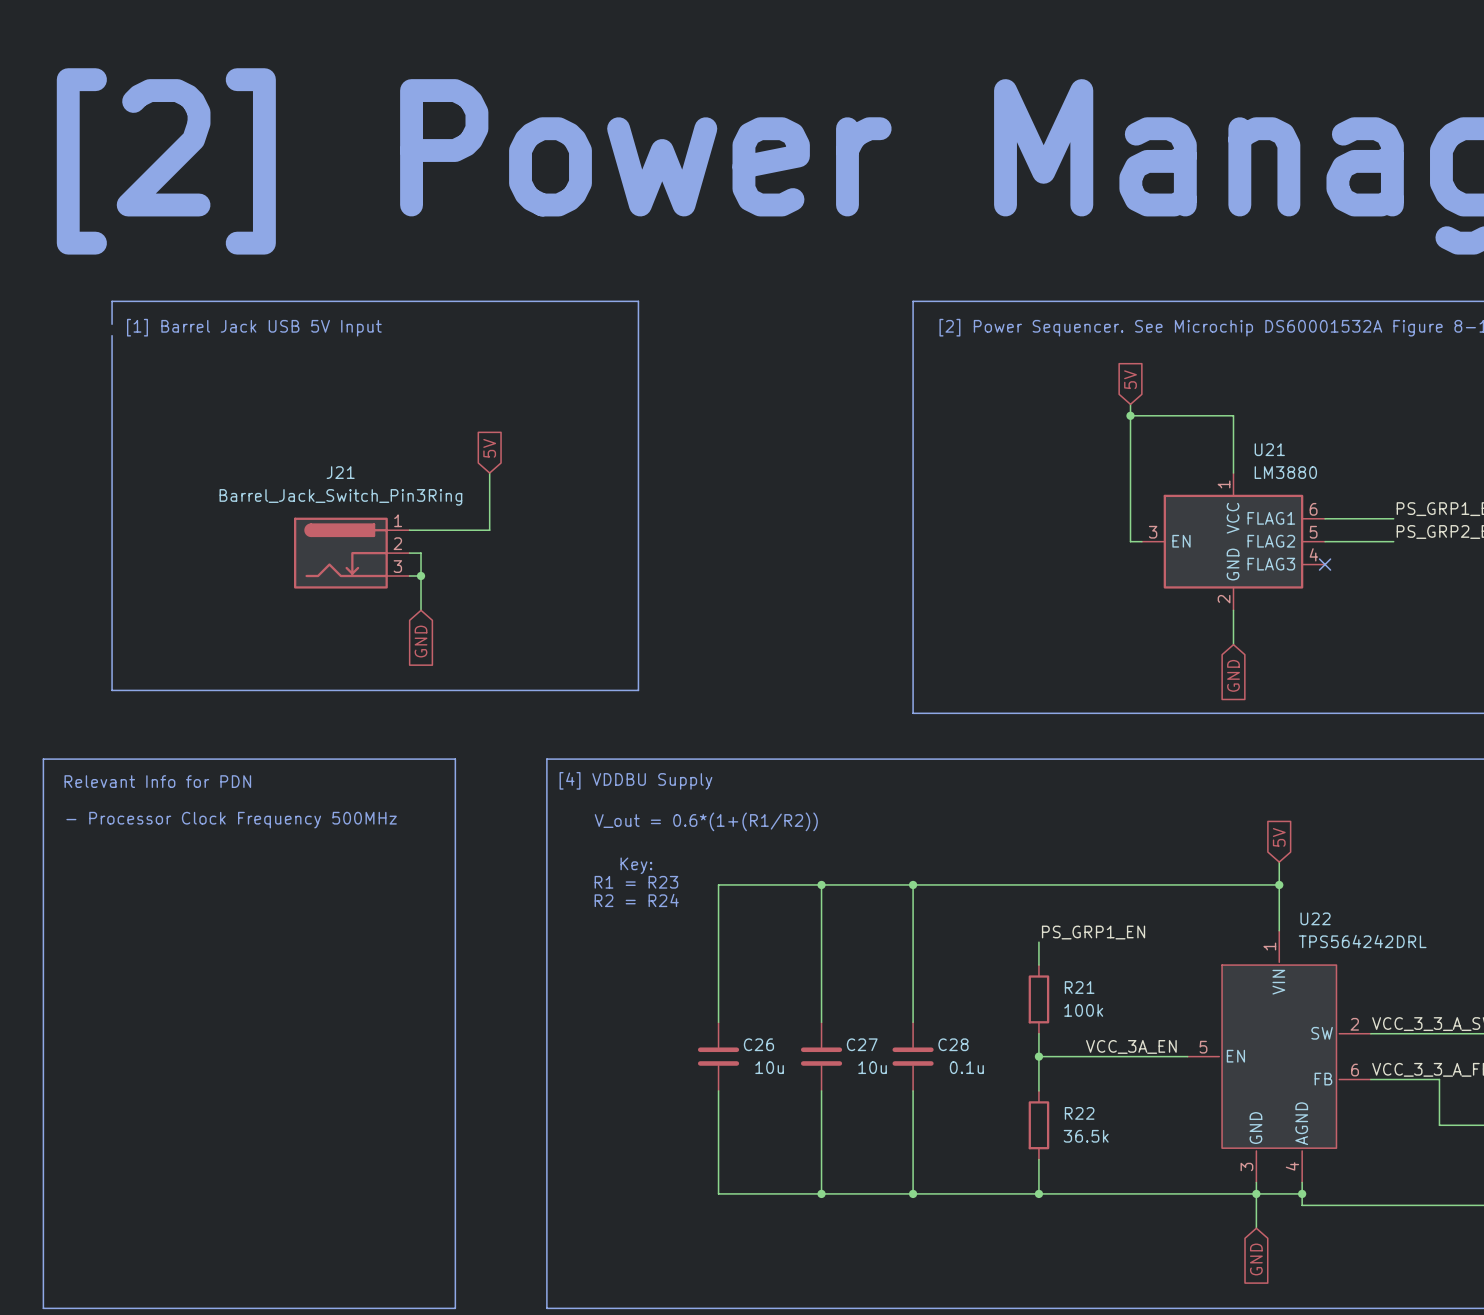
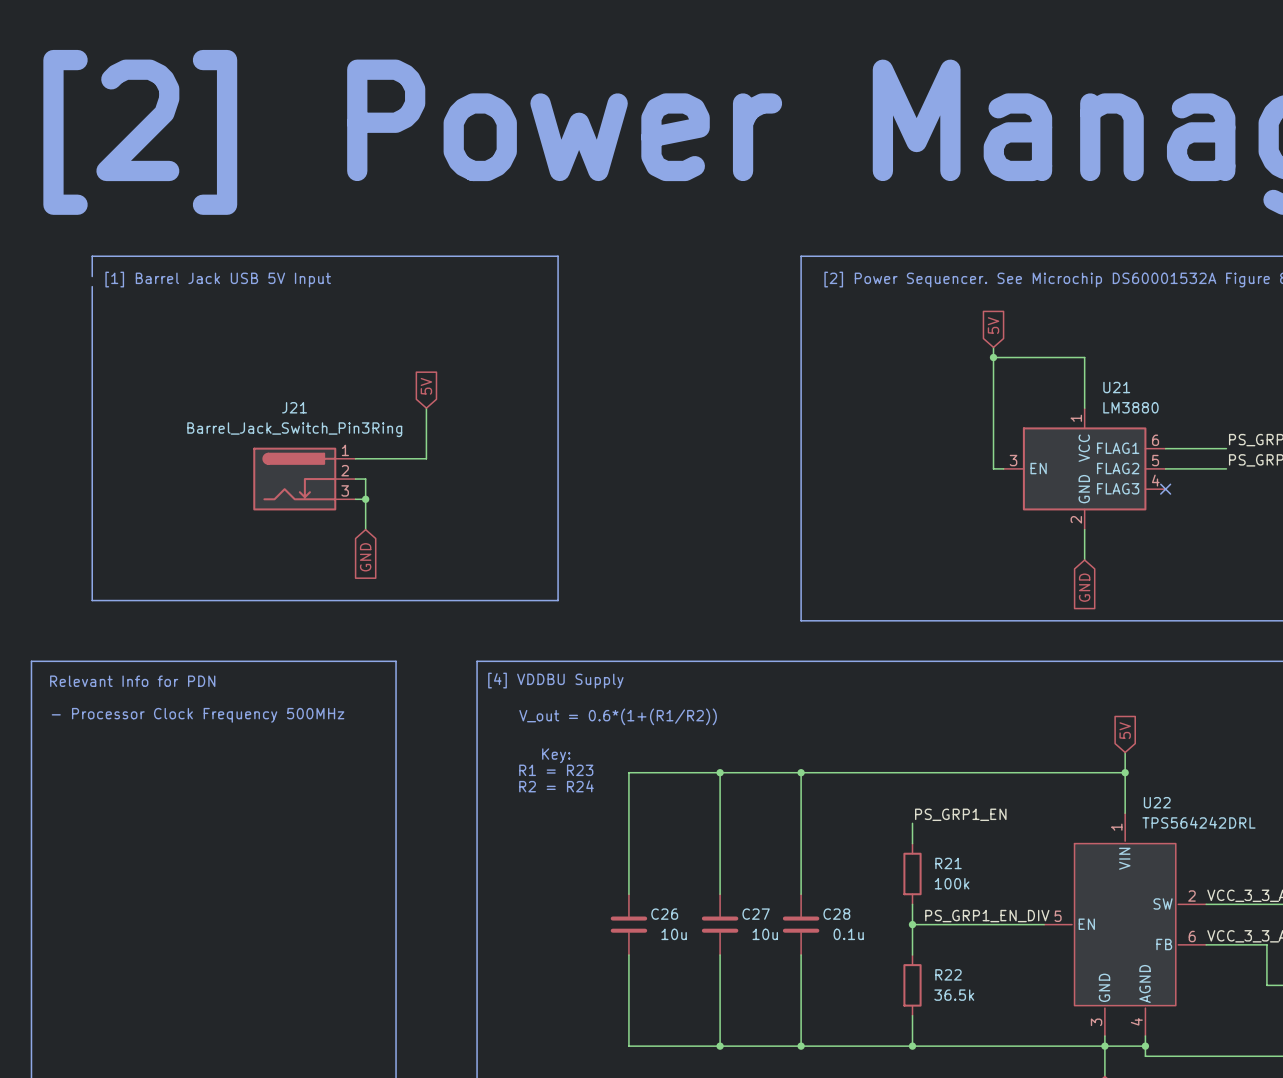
label: none -> PS_GRP1_EN_DIV (987, 916)
label: VCC_3A_EN (1131, 1046) -> none

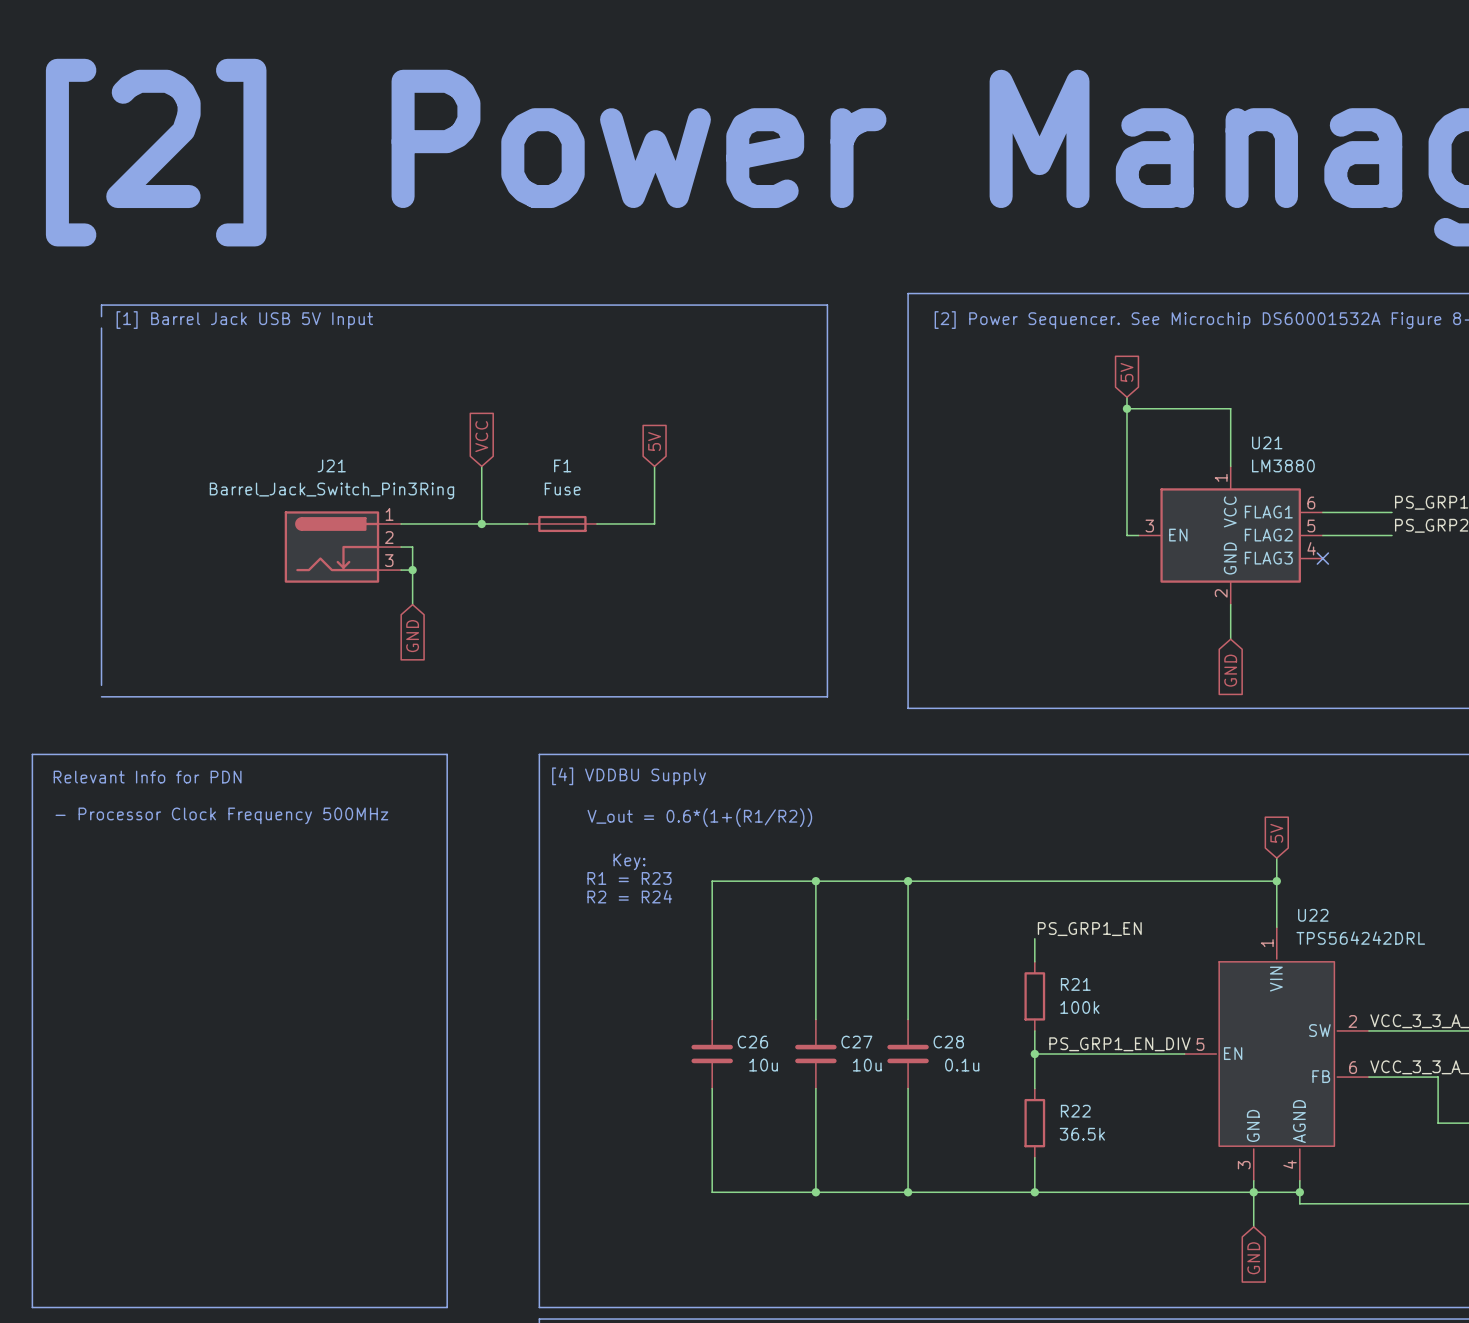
line: (92, 266) (92, 256) (558, 256) (558, 600) (92, 600) -> (101, 305) (827, 305) (827, 696) (101, 696)
global label: 5V (426, 386) -> VCC (481, 436)
global label: none -> 5V (654, 441)
wire: none -> (654, 466) (654, 523) (596, 523)
wire: none -> (481, 523) (527, 523)
junction: none -> (481, 523)
F1: none -> Fuse (562, 523)

